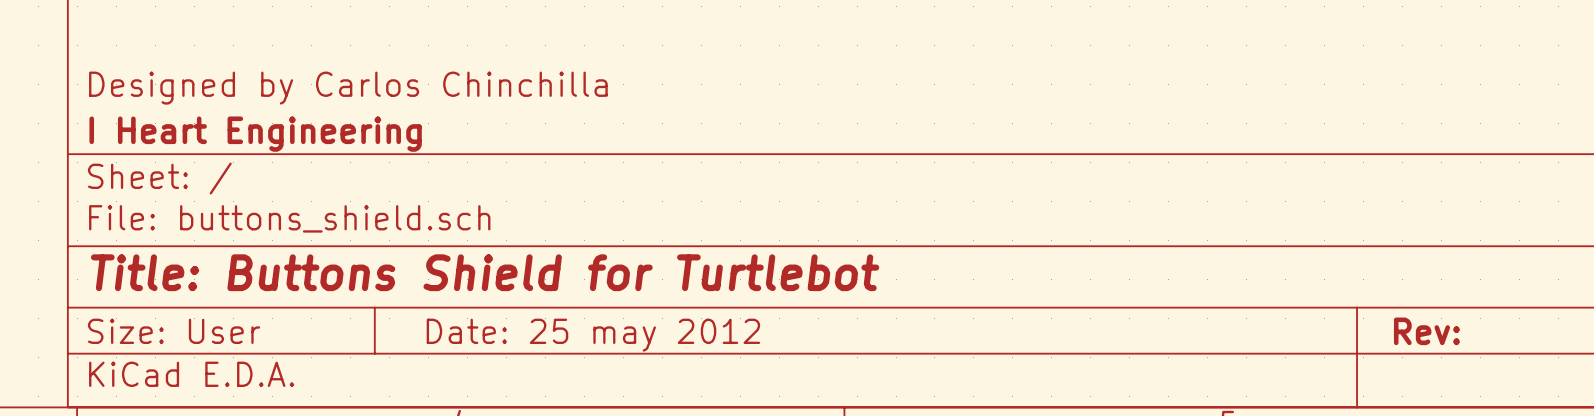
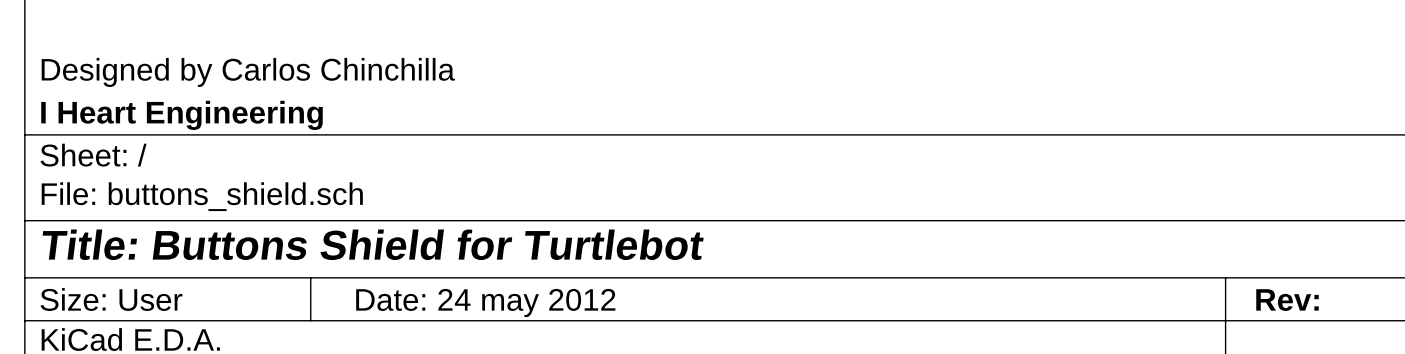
title block: Date: 25 may 2012 (593, 335) -> Date: 24 may 2012 (485, 302)

